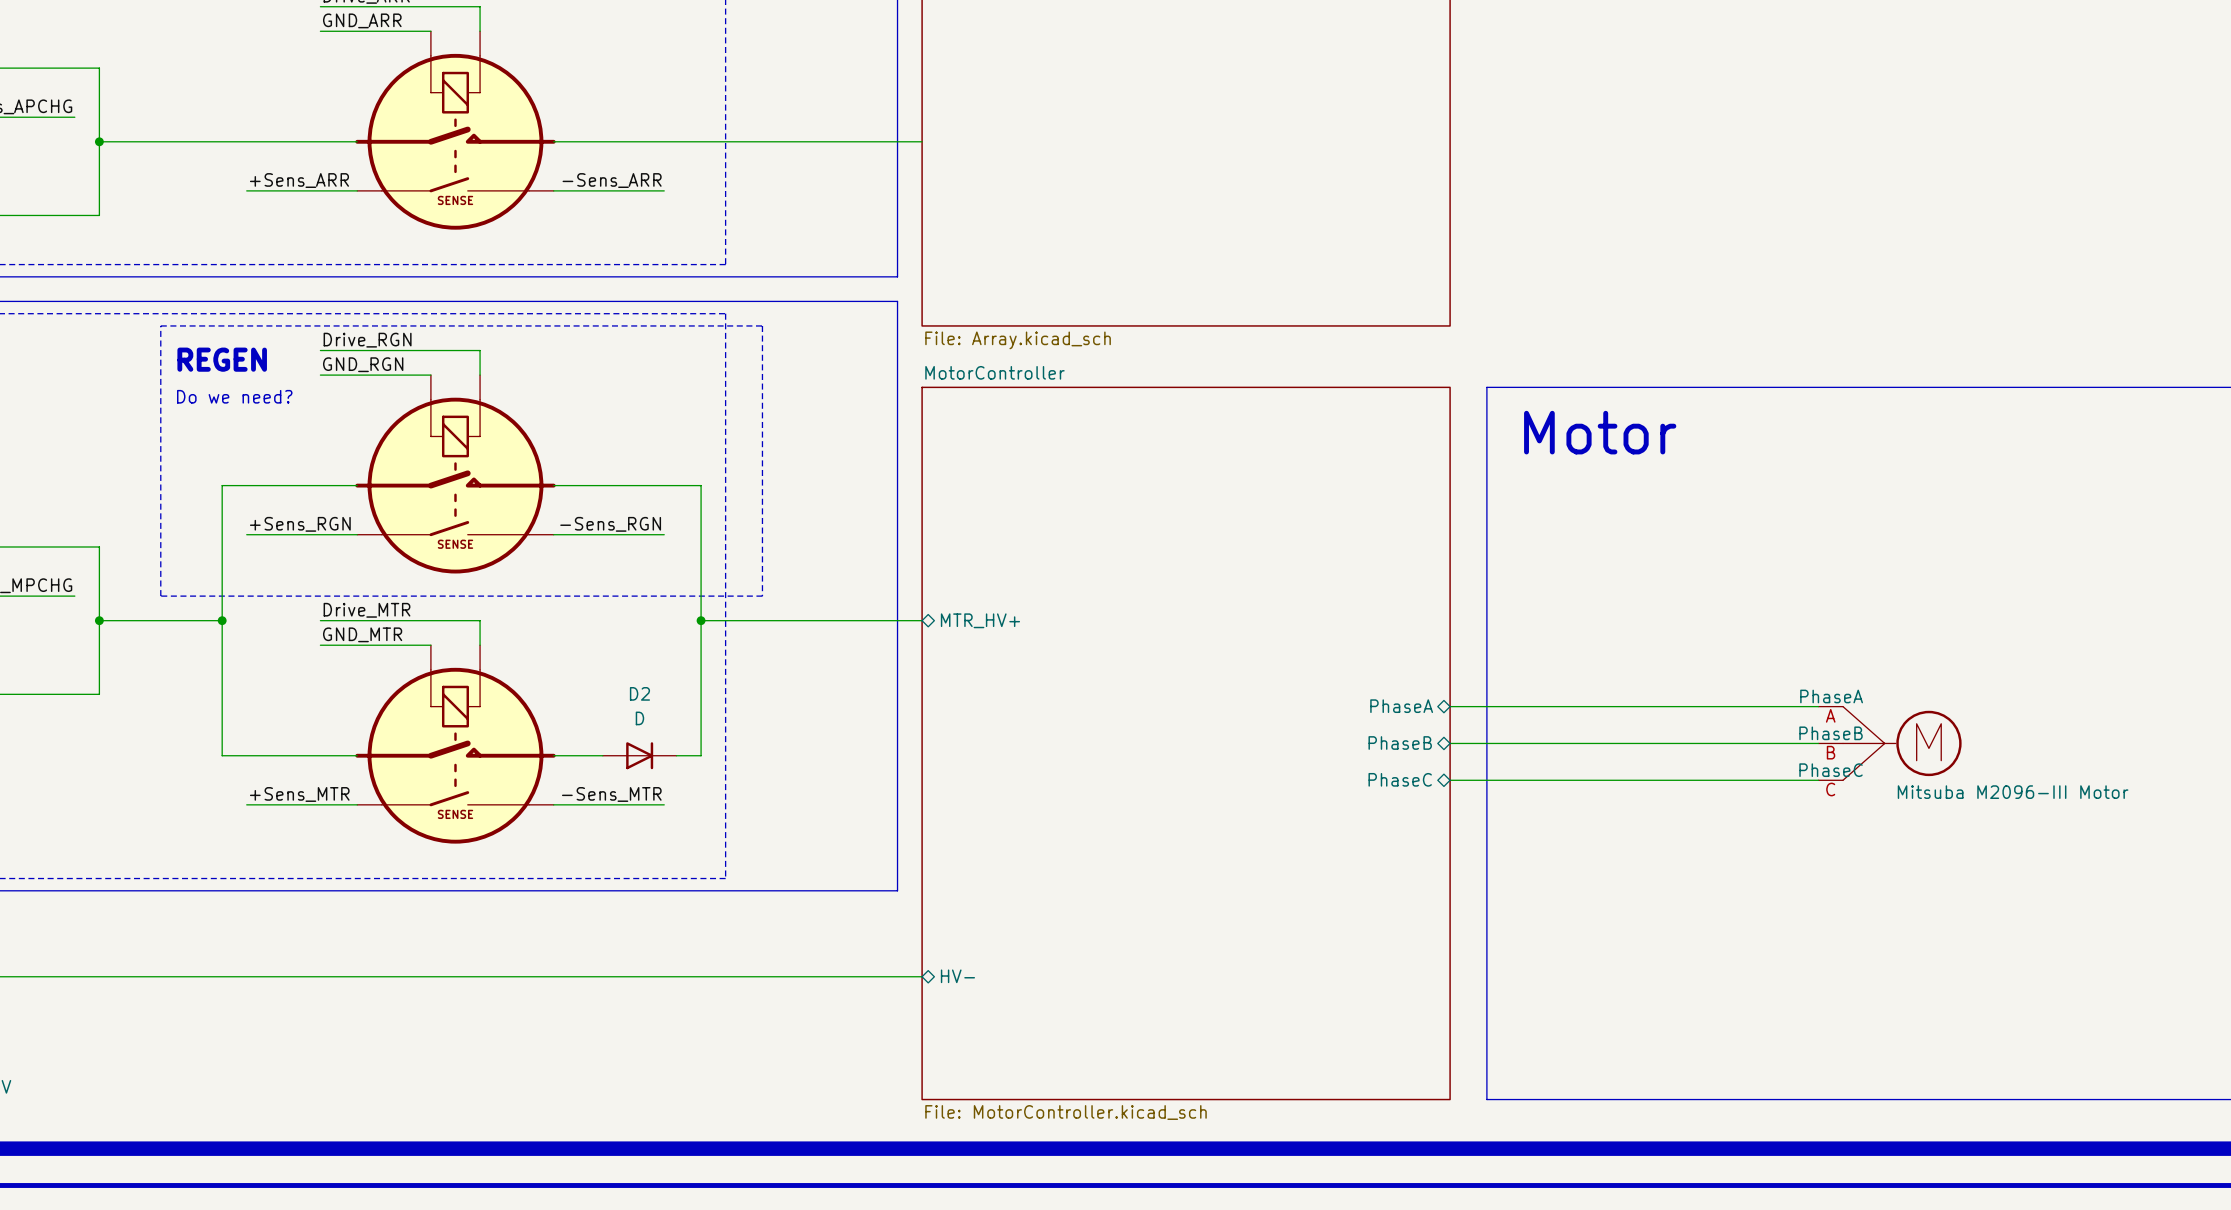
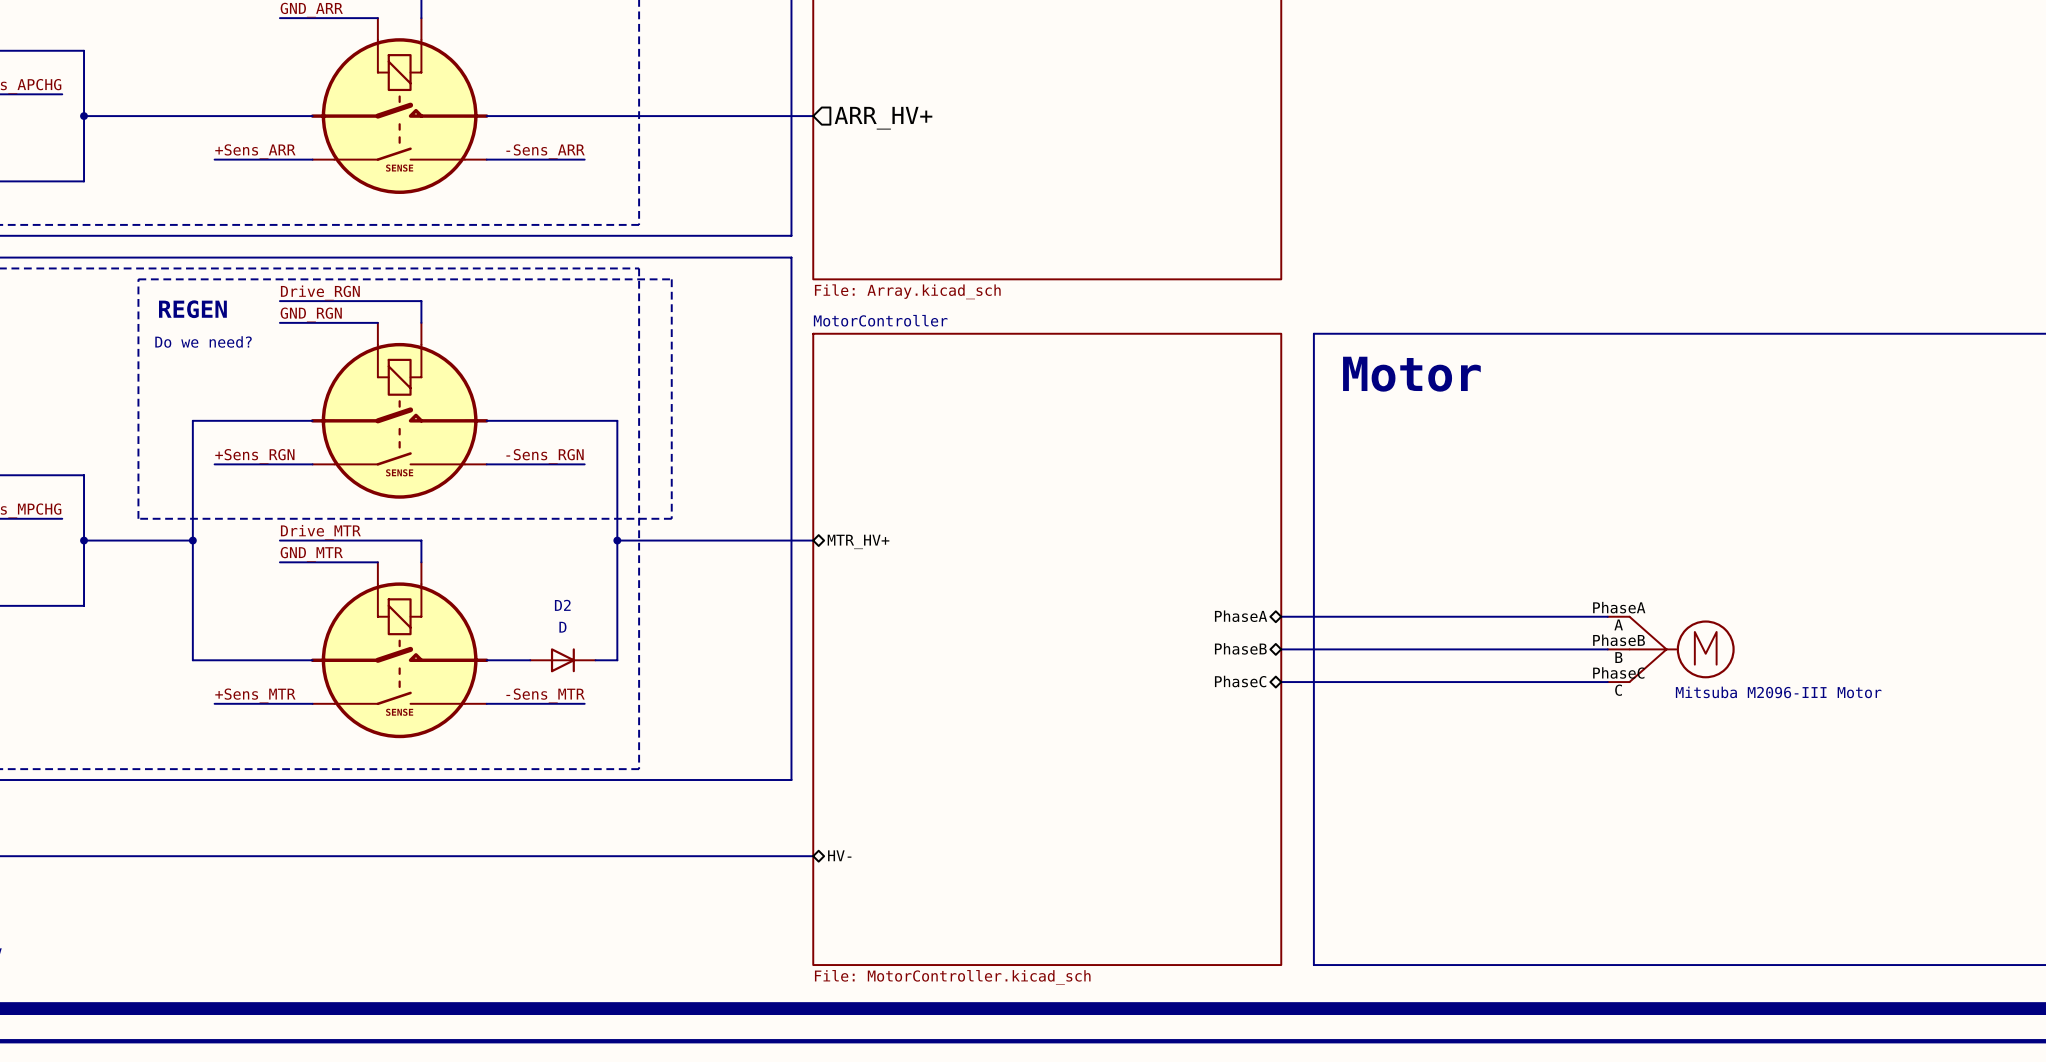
sheet pin: none -> ARR_HV+ (883, 118)

